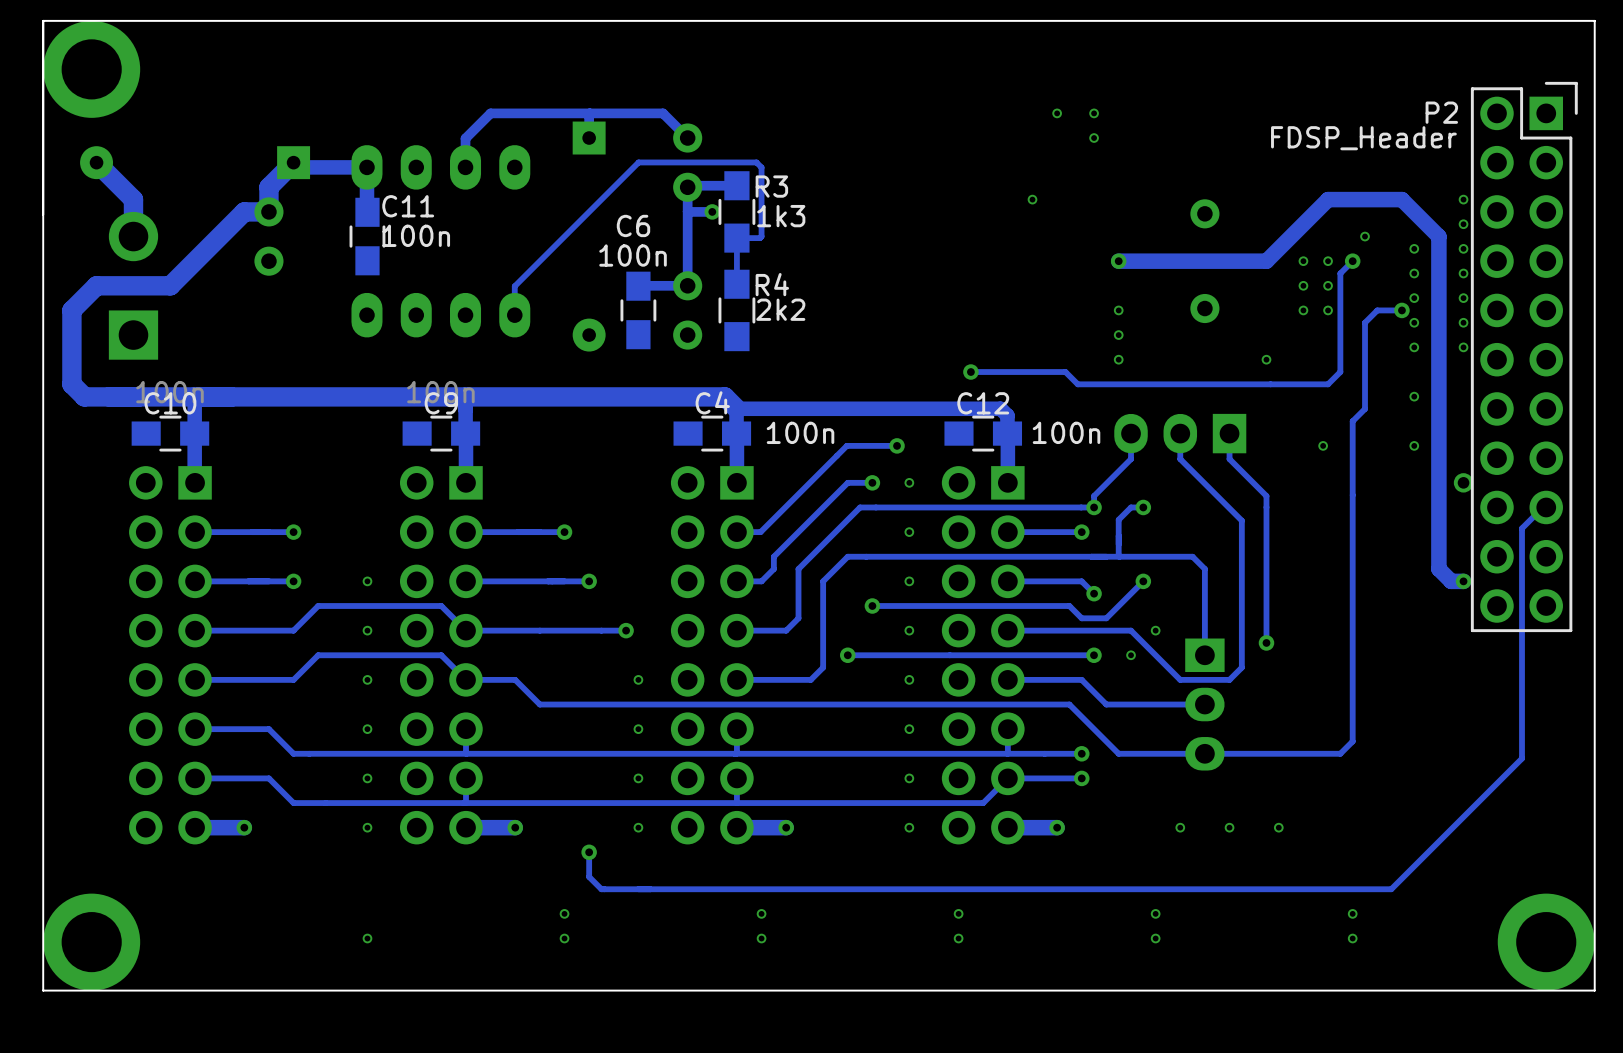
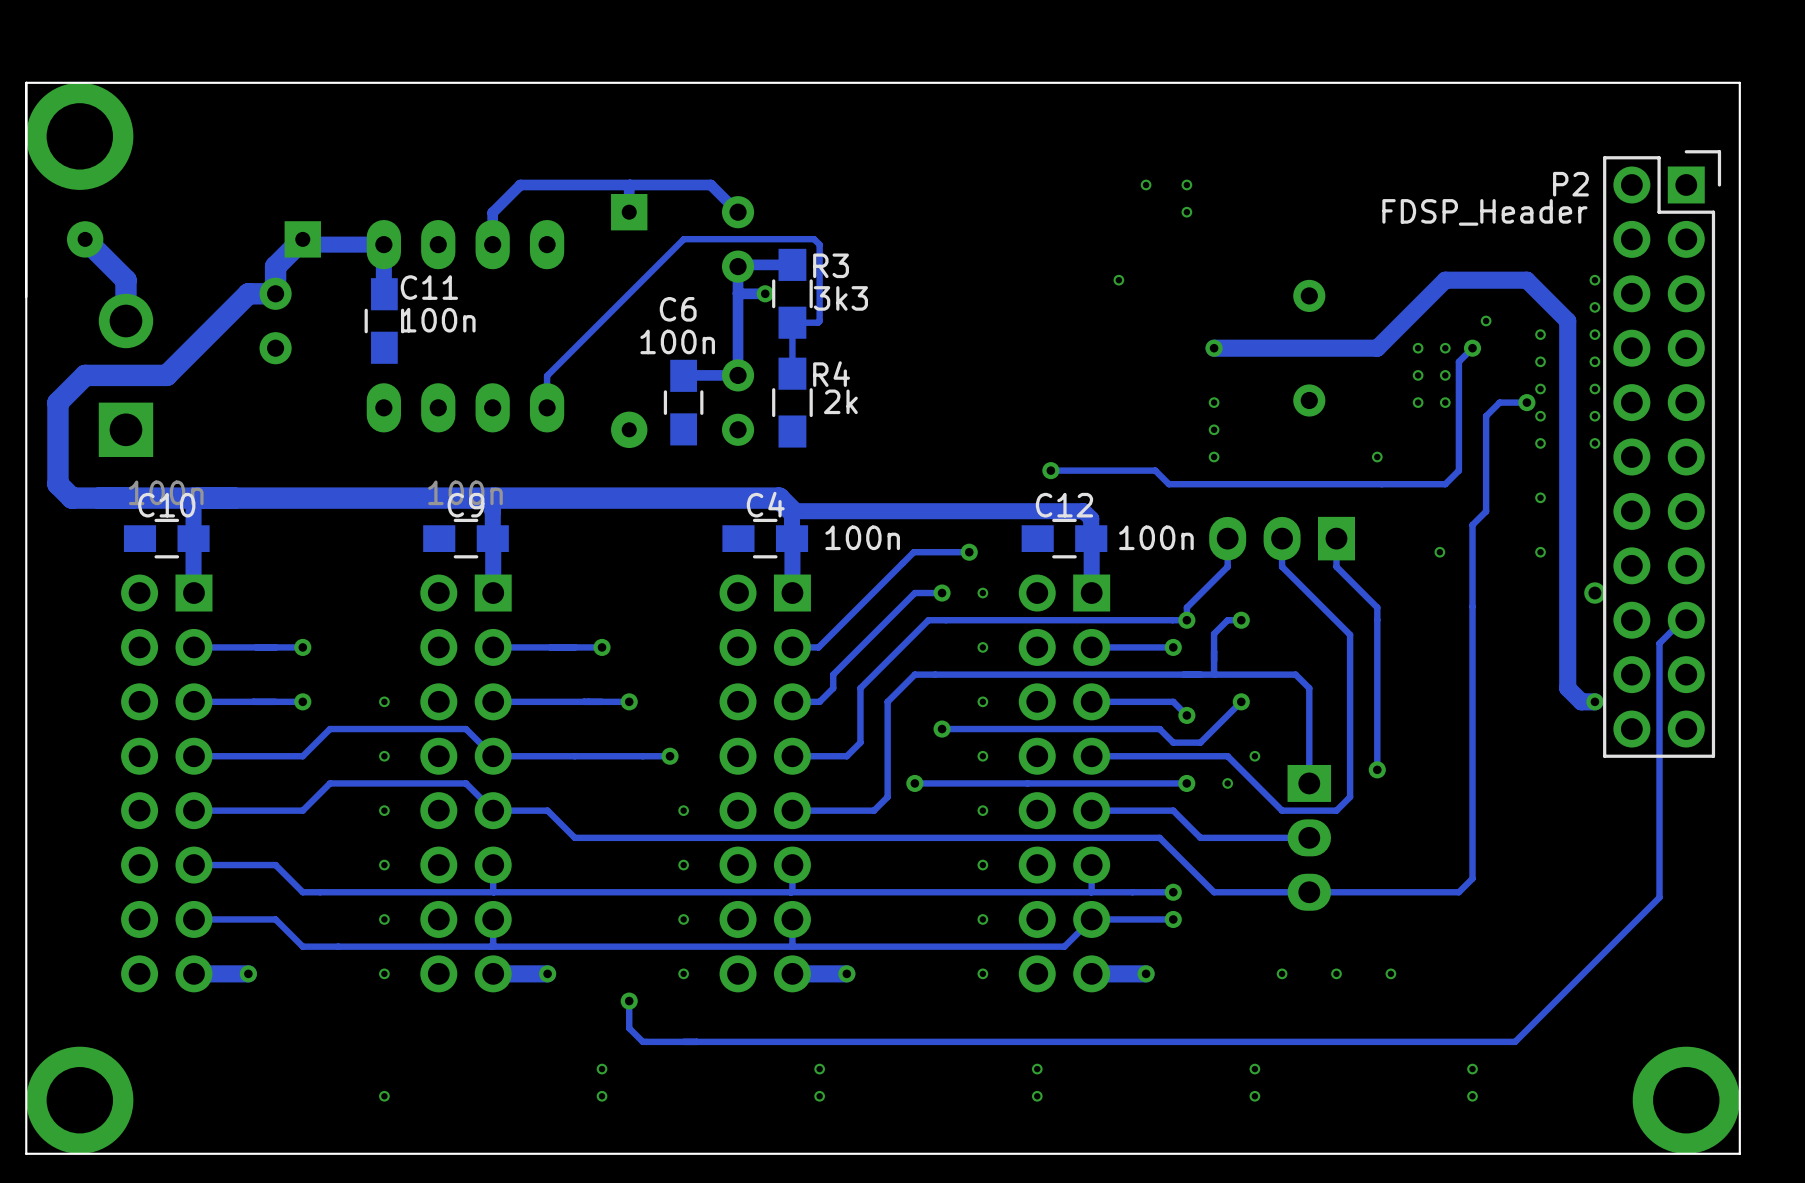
R3 value: 1k3 (781, 216) -> 3k3 (840, 298)
R4 value: 2k2 (780, 309) -> 2k (840, 401)

